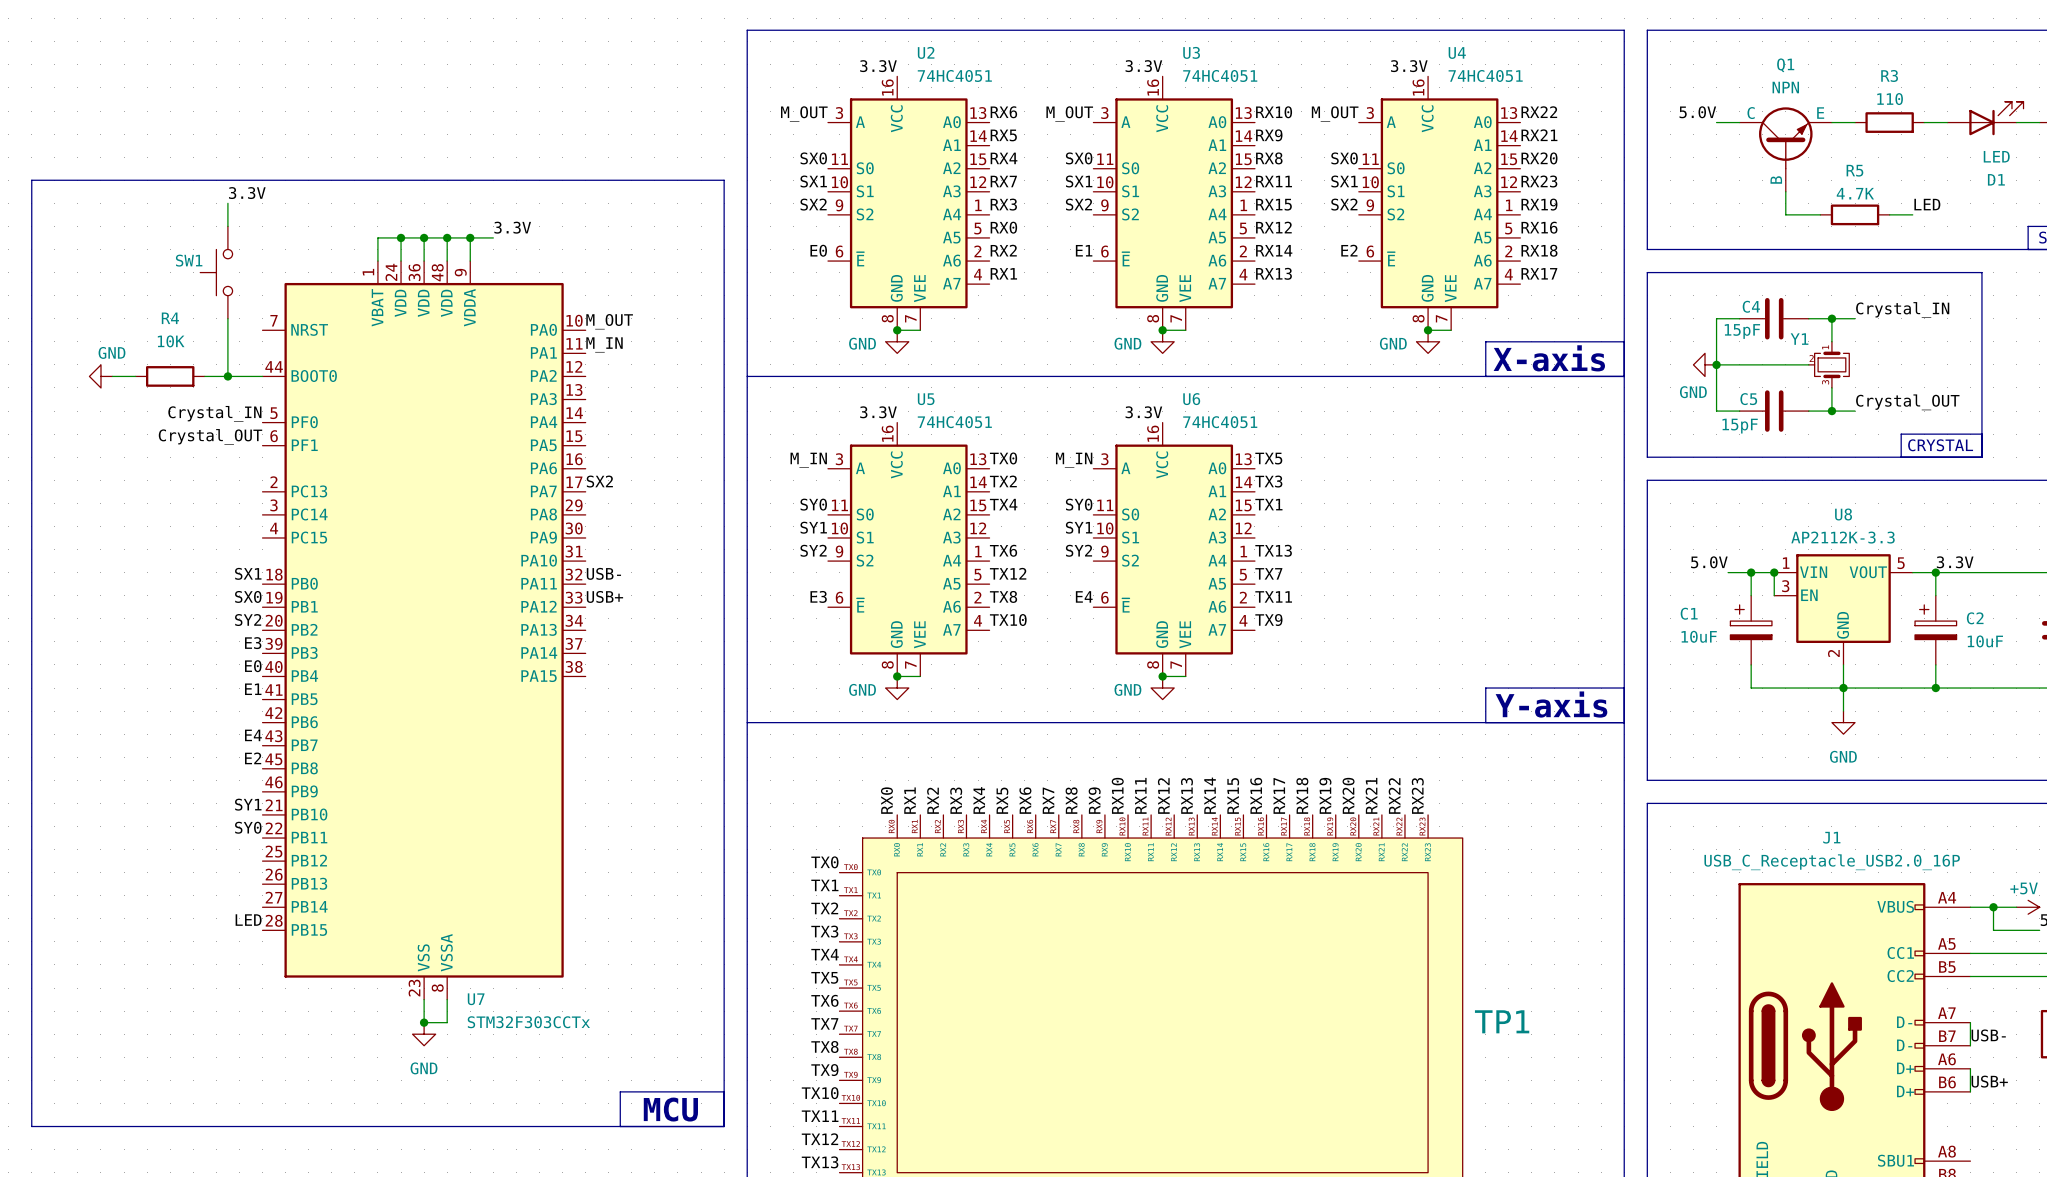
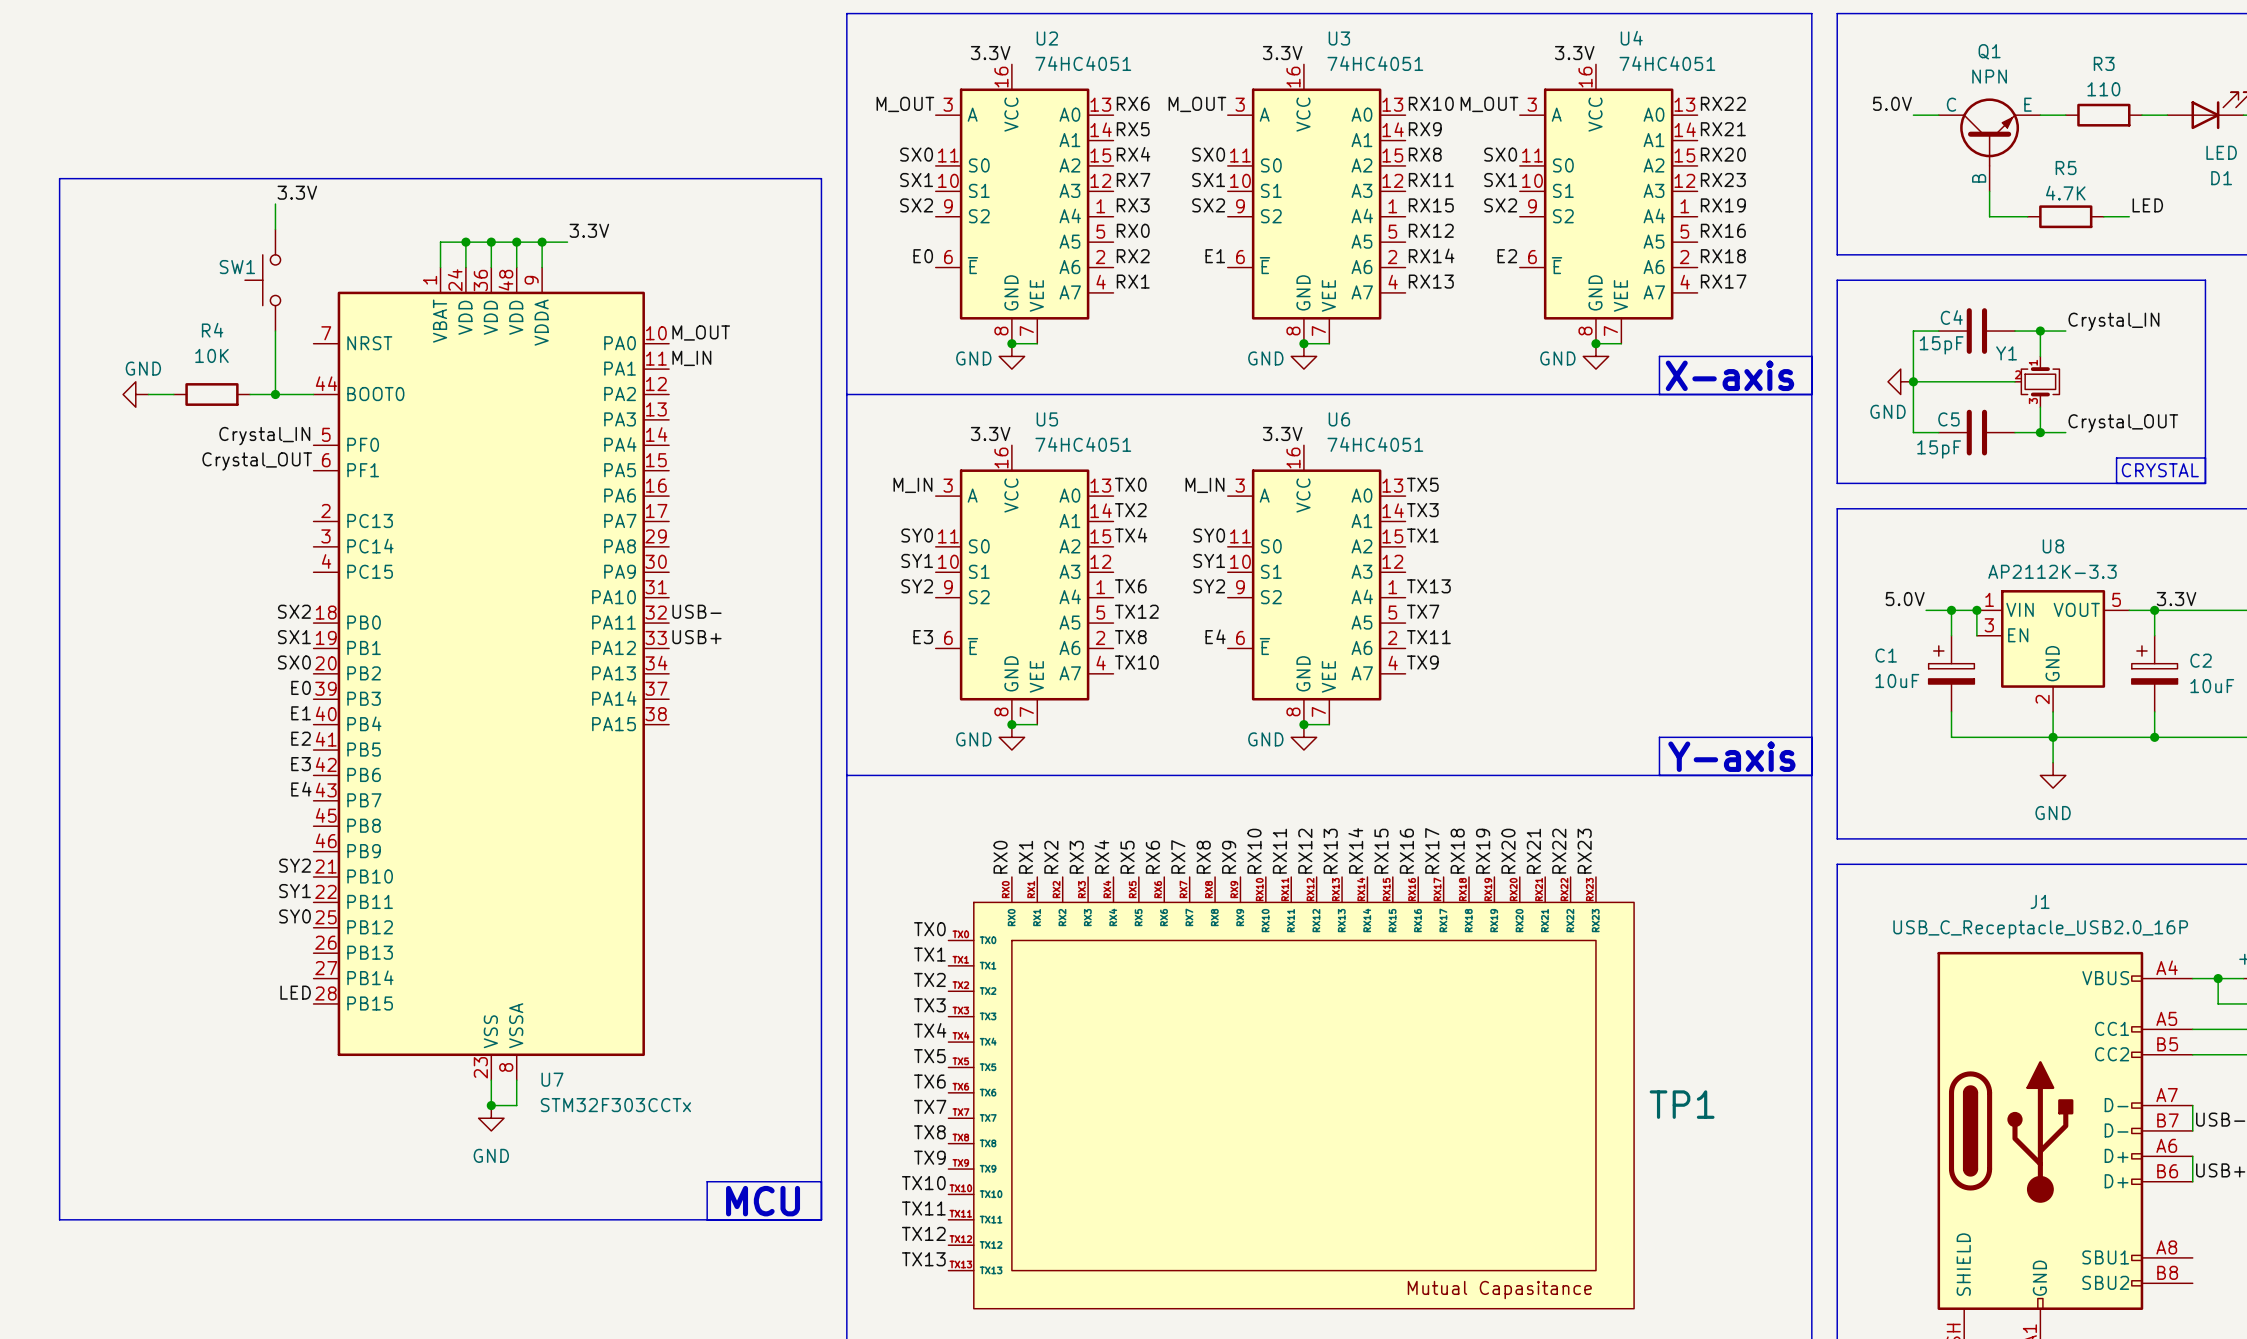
label: SX2 (599, 481) -> none
label: SX1 (248, 573) -> SX2 (294, 611)
label: SX0 (248, 596) -> SX1 (294, 637)
label: SY2 (248, 620) -> SX0 (294, 662)
label: E3 (253, 643) -> E0 (301, 687)
label: E0 (253, 666) -> E1 (301, 713)
label: E1 (253, 689) -> E2 (301, 738)
label: none -> E3 (301, 764)
label: E2 (253, 758) -> none
label: SY1 (248, 804) -> SY2 (295, 865)
label: SY0 (248, 827) -> SY1 (295, 891)
label: none -> SY0 (295, 916)

